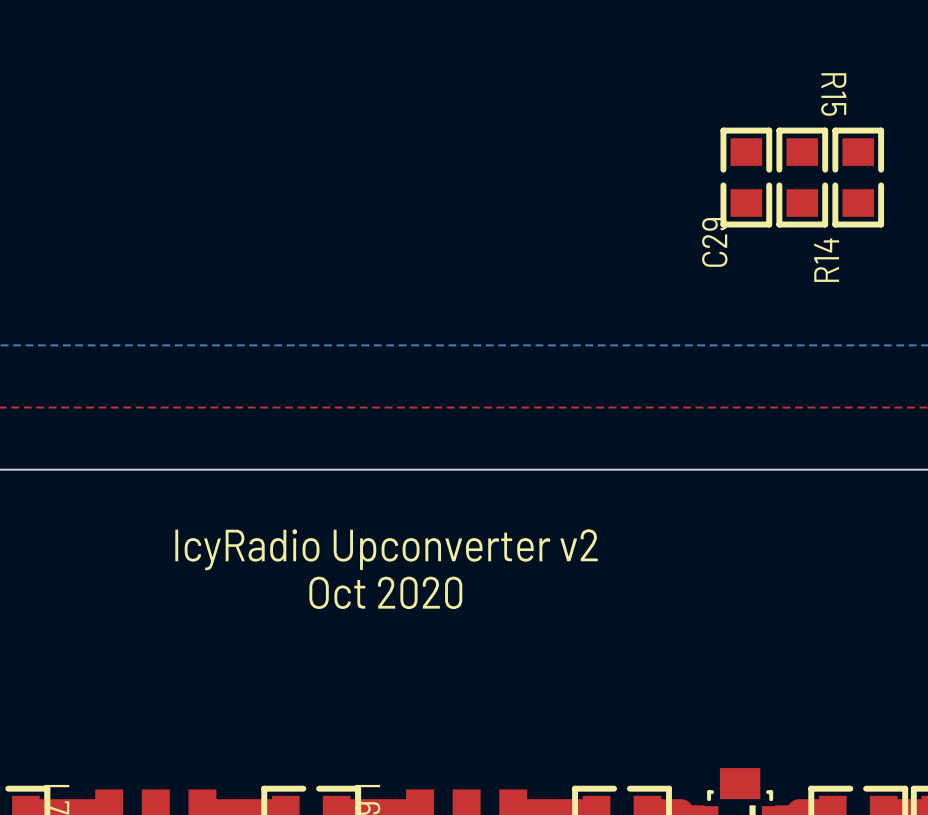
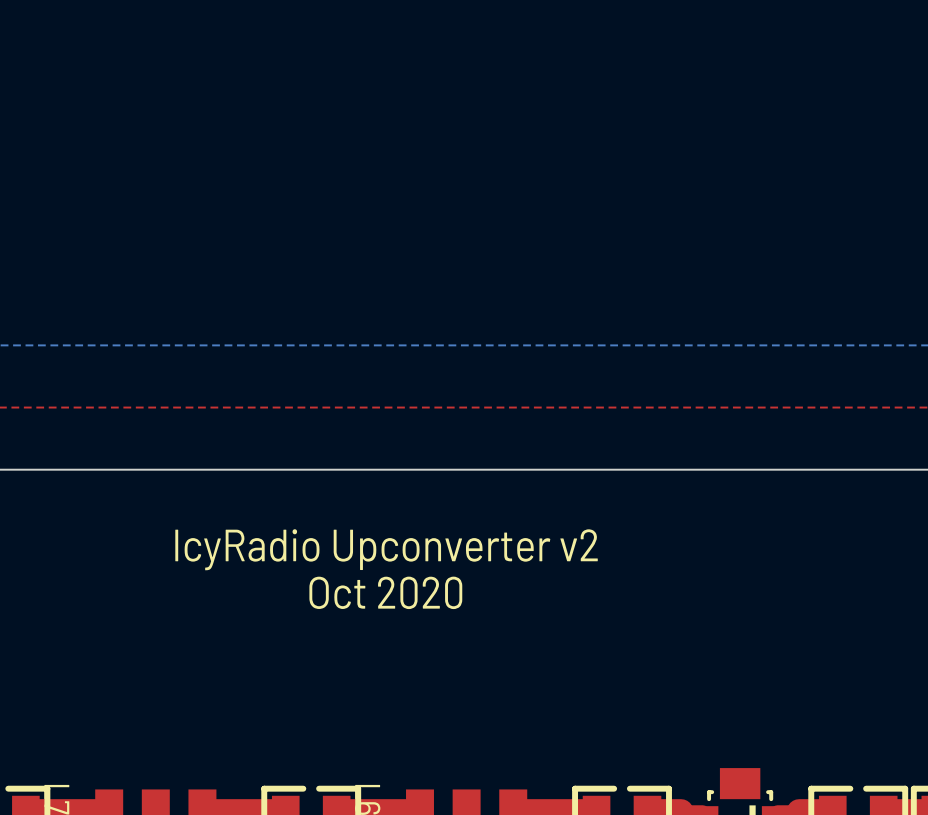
C29: (746, 177) -> none
R15: (802, 177) -> none
R14: (858, 177) -> none

